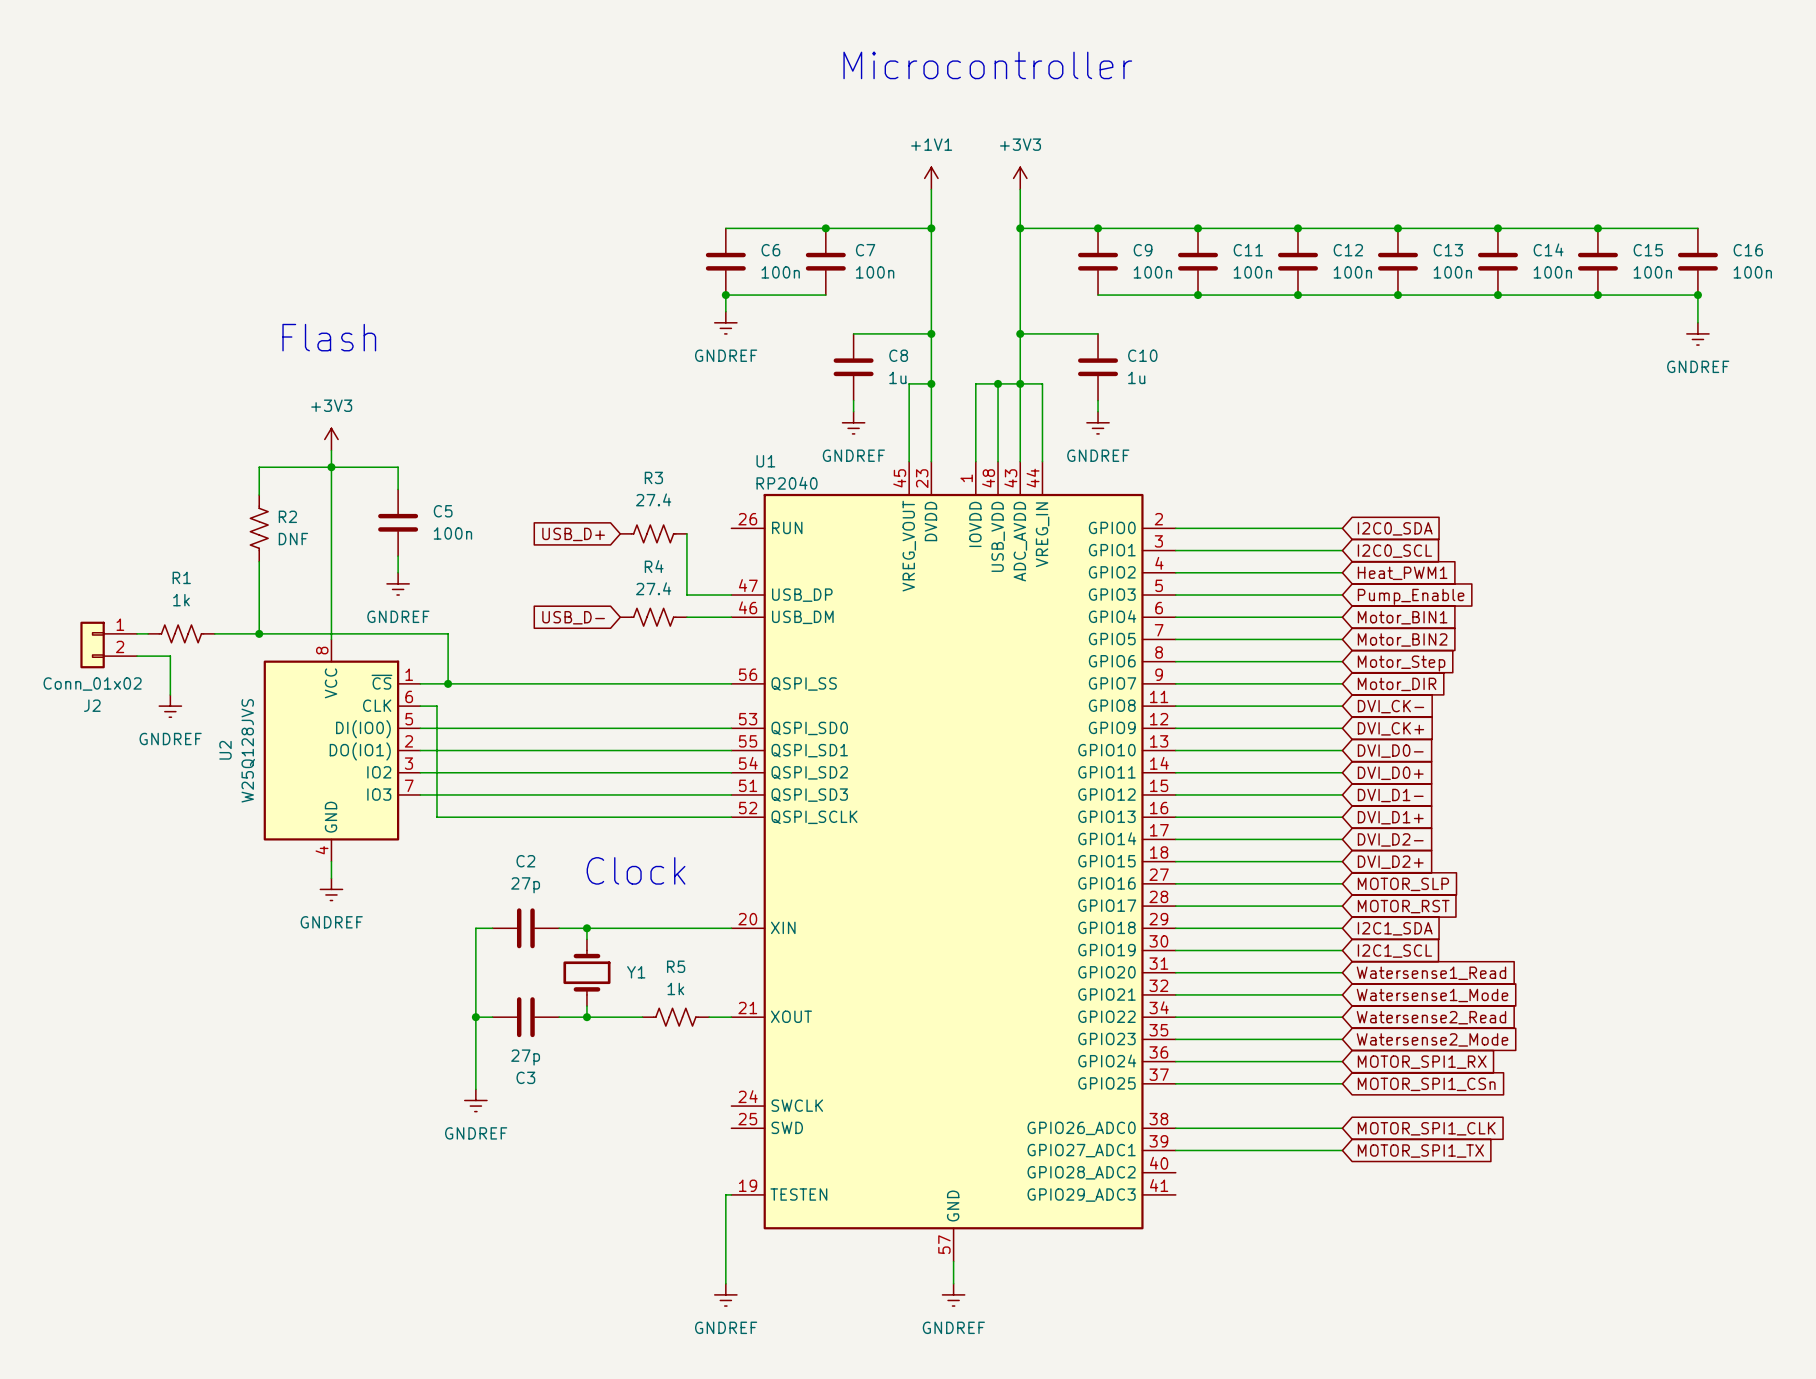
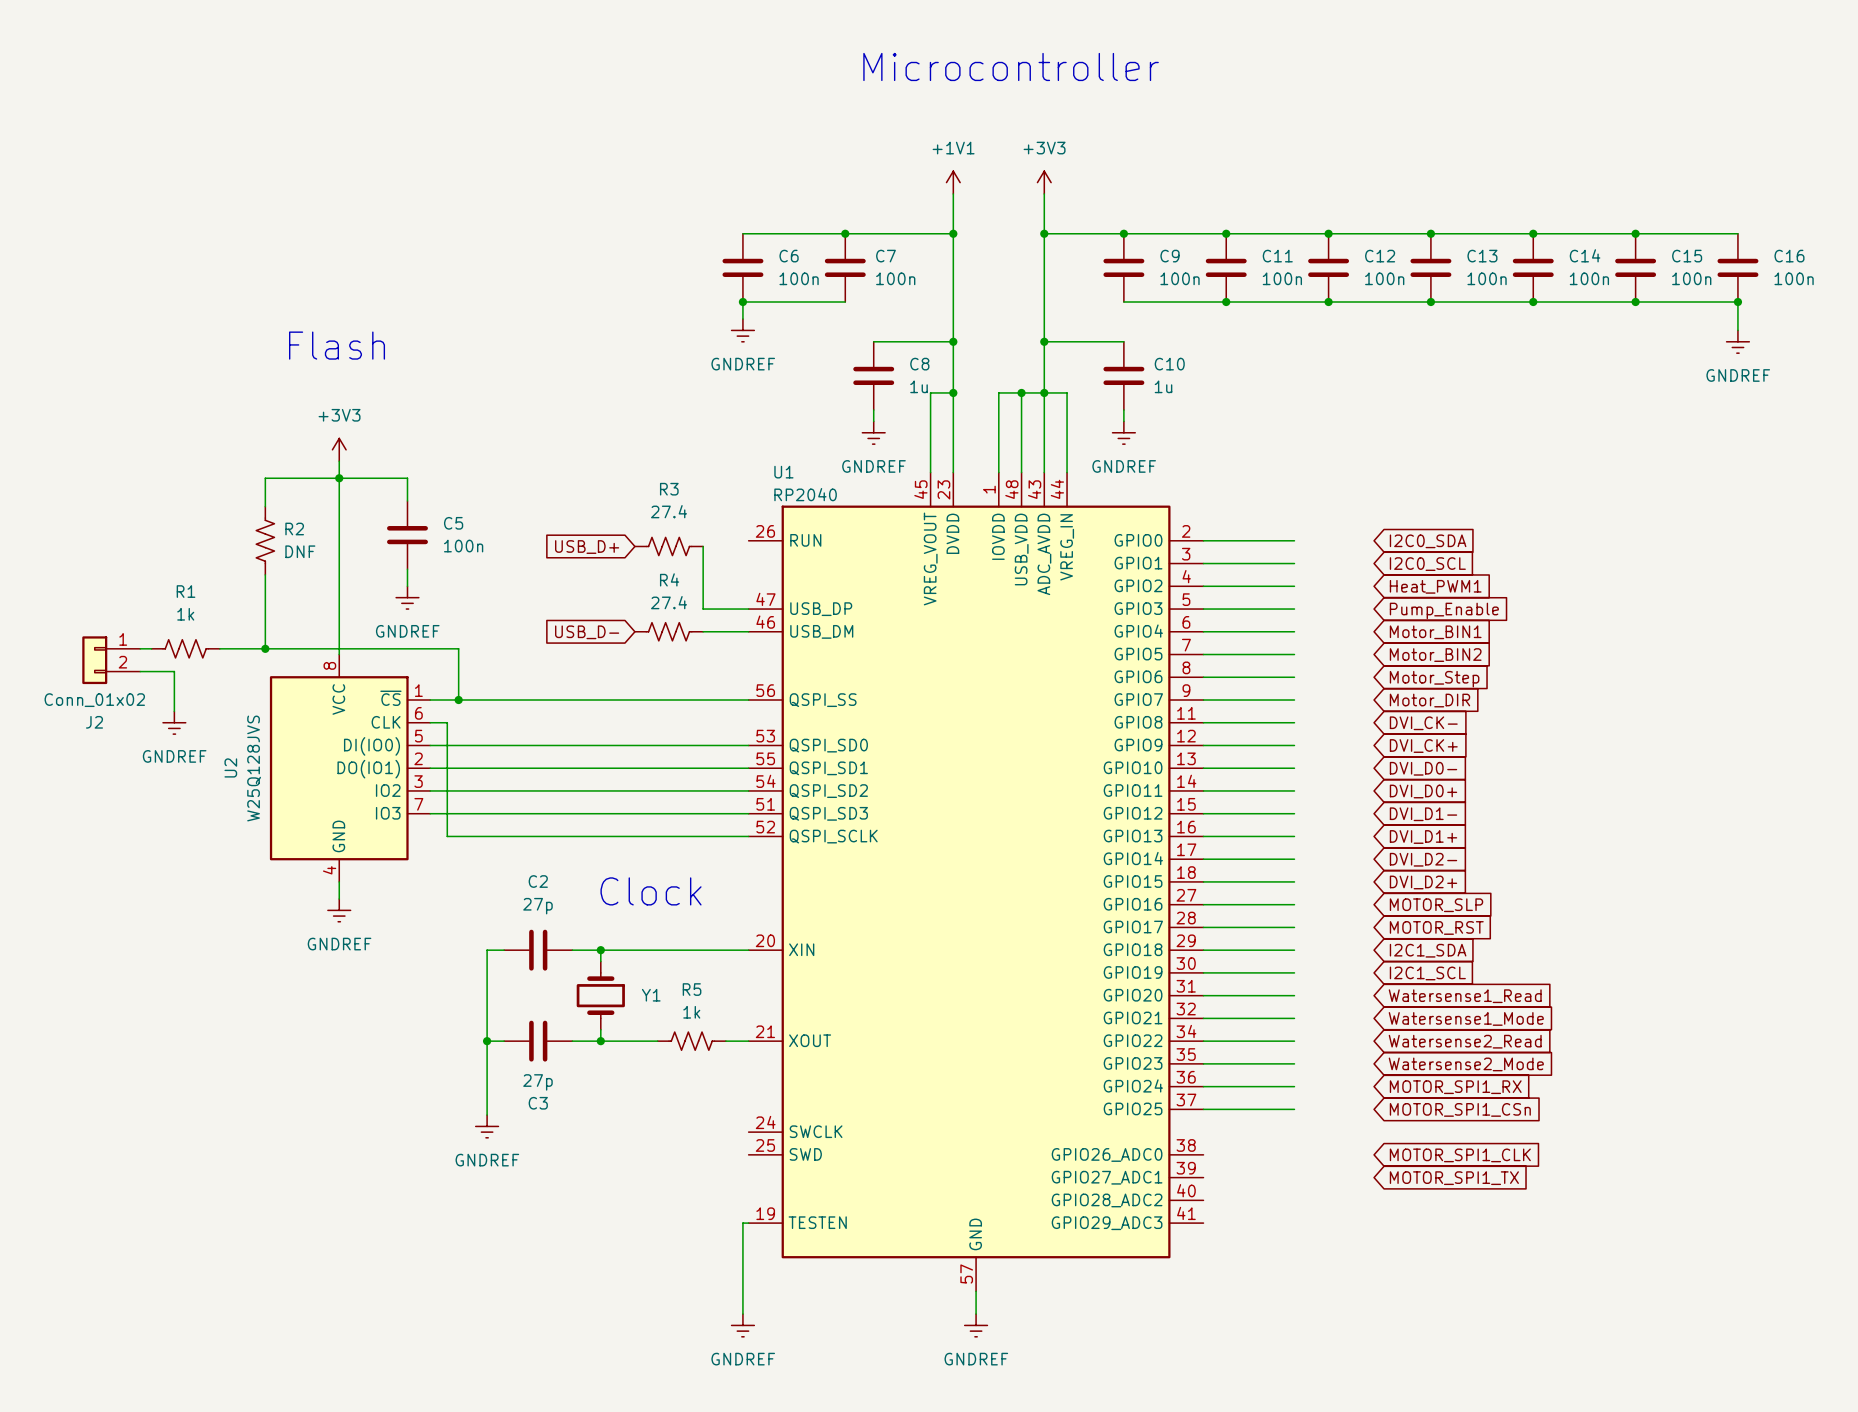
wire: (1264, 528) (1342, 528) -> none
wire: (1264, 550) (1342, 550) -> none
wire: (1264, 572) (1342, 572) -> none
wire: (1264, 595) (1342, 595) -> none
wire: (1264, 617) (1342, 617) -> none
wire: (1264, 639) (1342, 639) -> none
wire: (1264, 661) (1342, 661) -> none
wire: (1264, 683) (1342, 683) -> none
wire: (1264, 706) (1342, 706) -> none
wire: (1264, 728) (1342, 728) -> none
wire: (1264, 750) (1342, 750) -> none
wire: (1264, 772) (1342, 772) -> none
wire: (1264, 794) (1342, 794) -> none
wire: (1264, 817) (1342, 817) -> none
wire: (1264, 839) (1342, 839) -> none
wire: (1264, 861) (1342, 861) -> none
wire: (1264, 883) (1342, 883) -> none
wire: (1264, 906) (1342, 906) -> none
wire: (1264, 928) (1342, 928) -> none
wire: (1264, 950) (1342, 950) -> none
wire: (1264, 972) (1342, 972) -> none
wire: (1264, 994) (1342, 994) -> none
wire: (1264, 1017) (1342, 1017) -> none
wire: (1264, 1039) (1342, 1039) -> none
wire: (1264, 1061) (1342, 1061) -> none
wire: (1264, 1083) (1342, 1083) -> none
wire: (1175, 1128) (1342, 1128) -> none
wire: (1175, 1150) (1342, 1150) -> none

